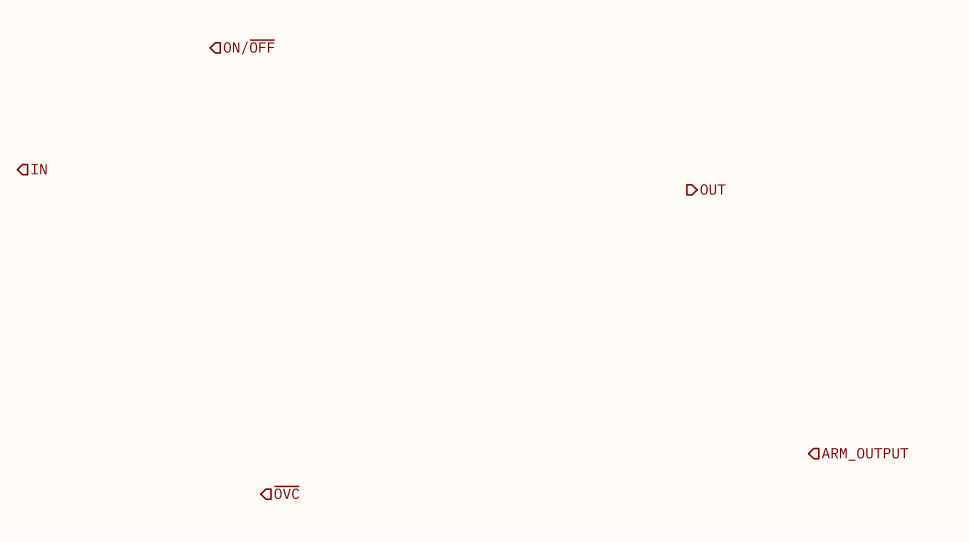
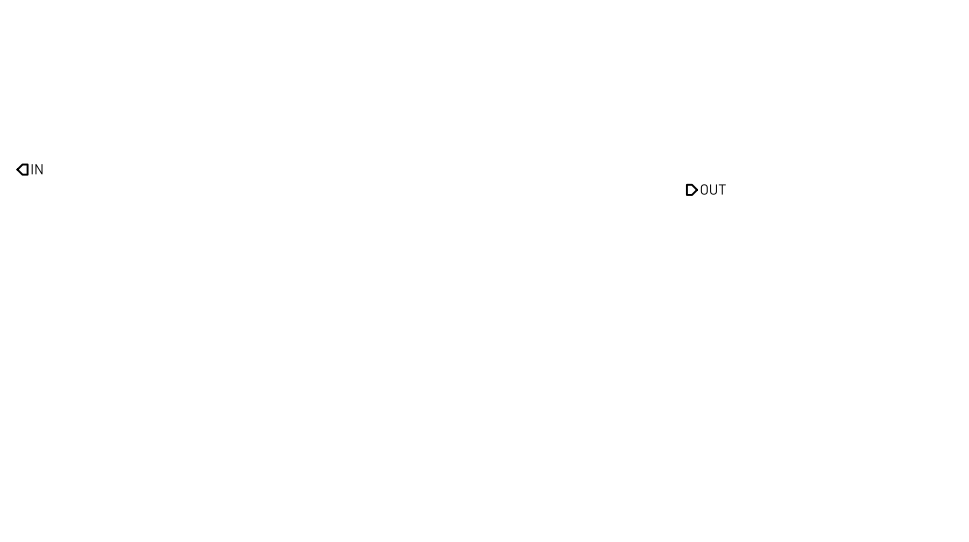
hierarchical label: ON/~{OFF} (249, 47) -> none
hierarchical label: ARM_OUTPUT (865, 454) -> none
hierarchical label: ~{OVC} (286, 492) -> none

